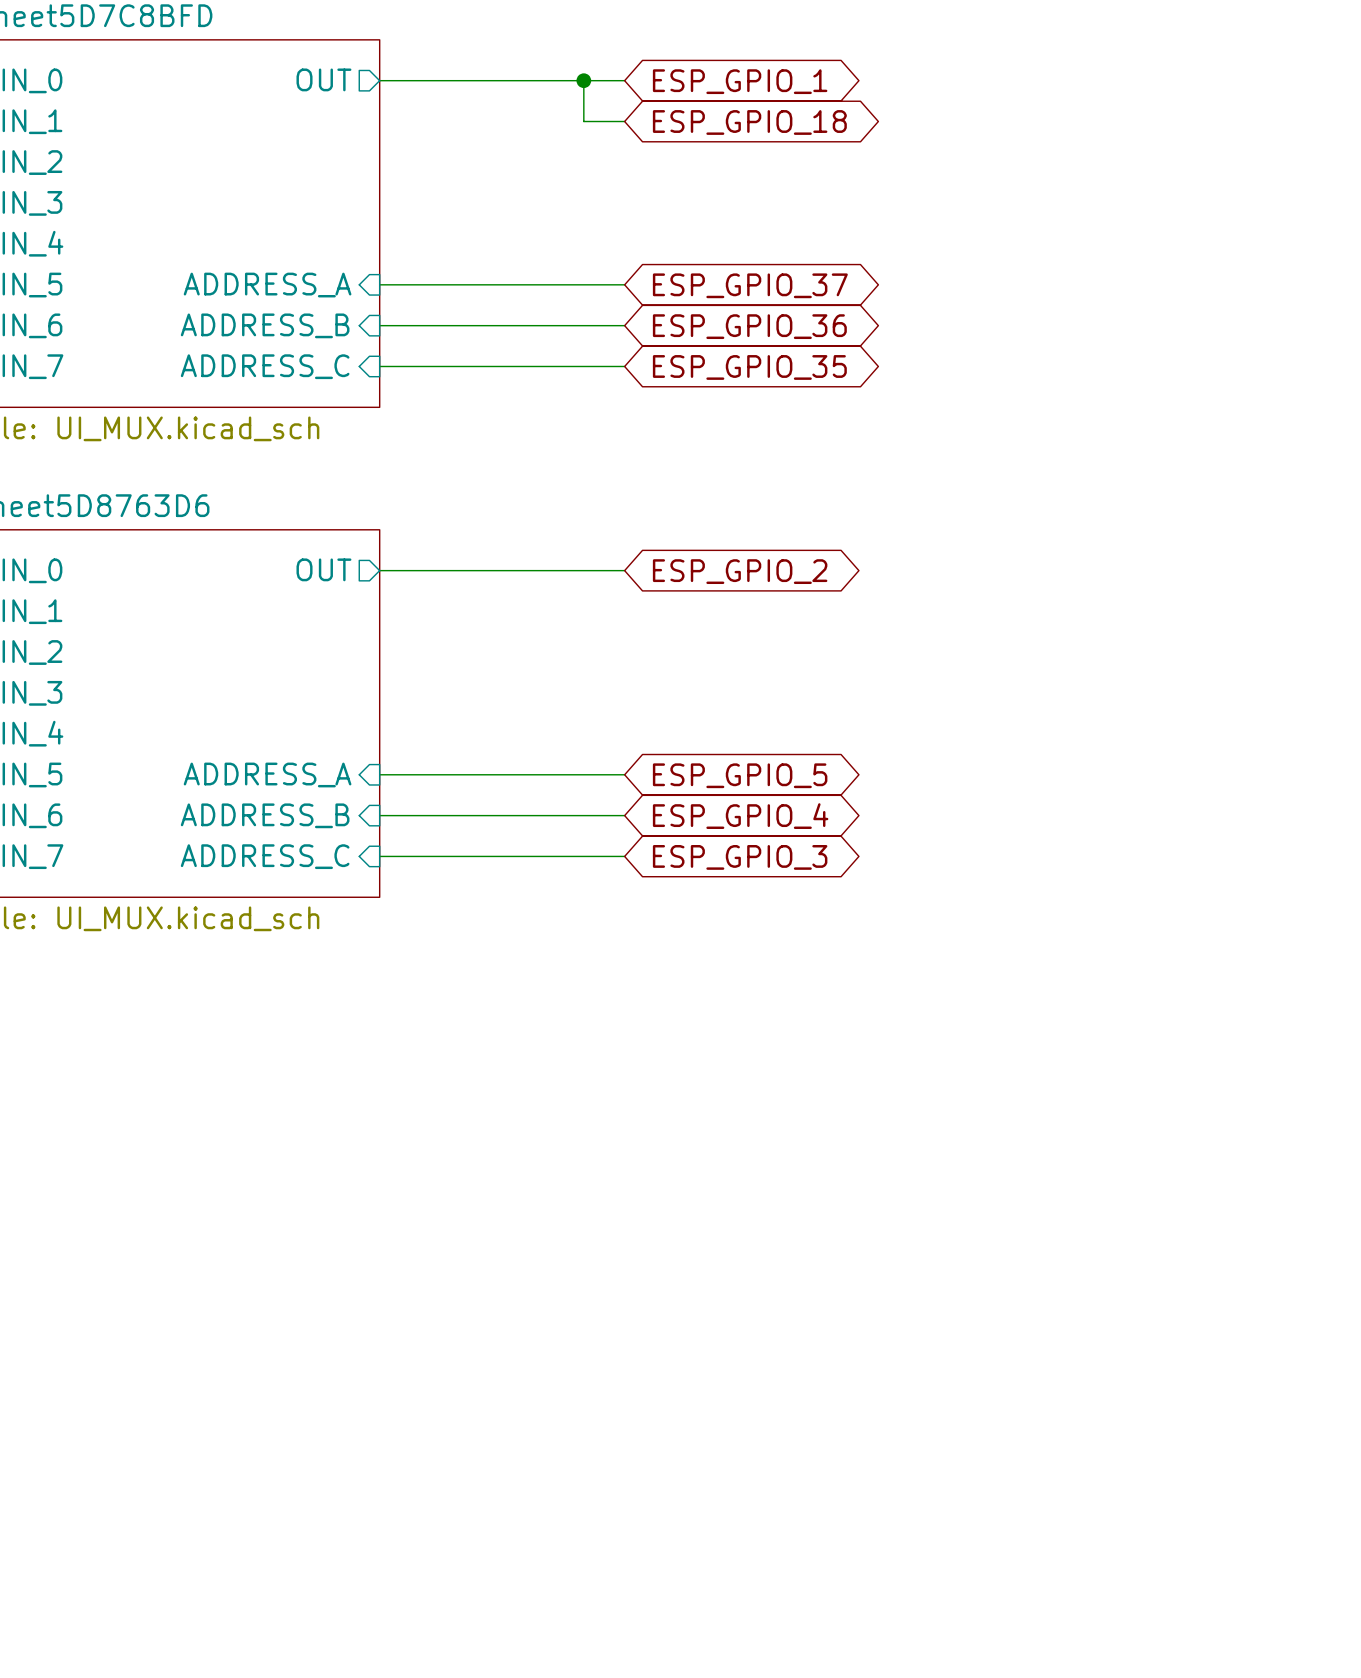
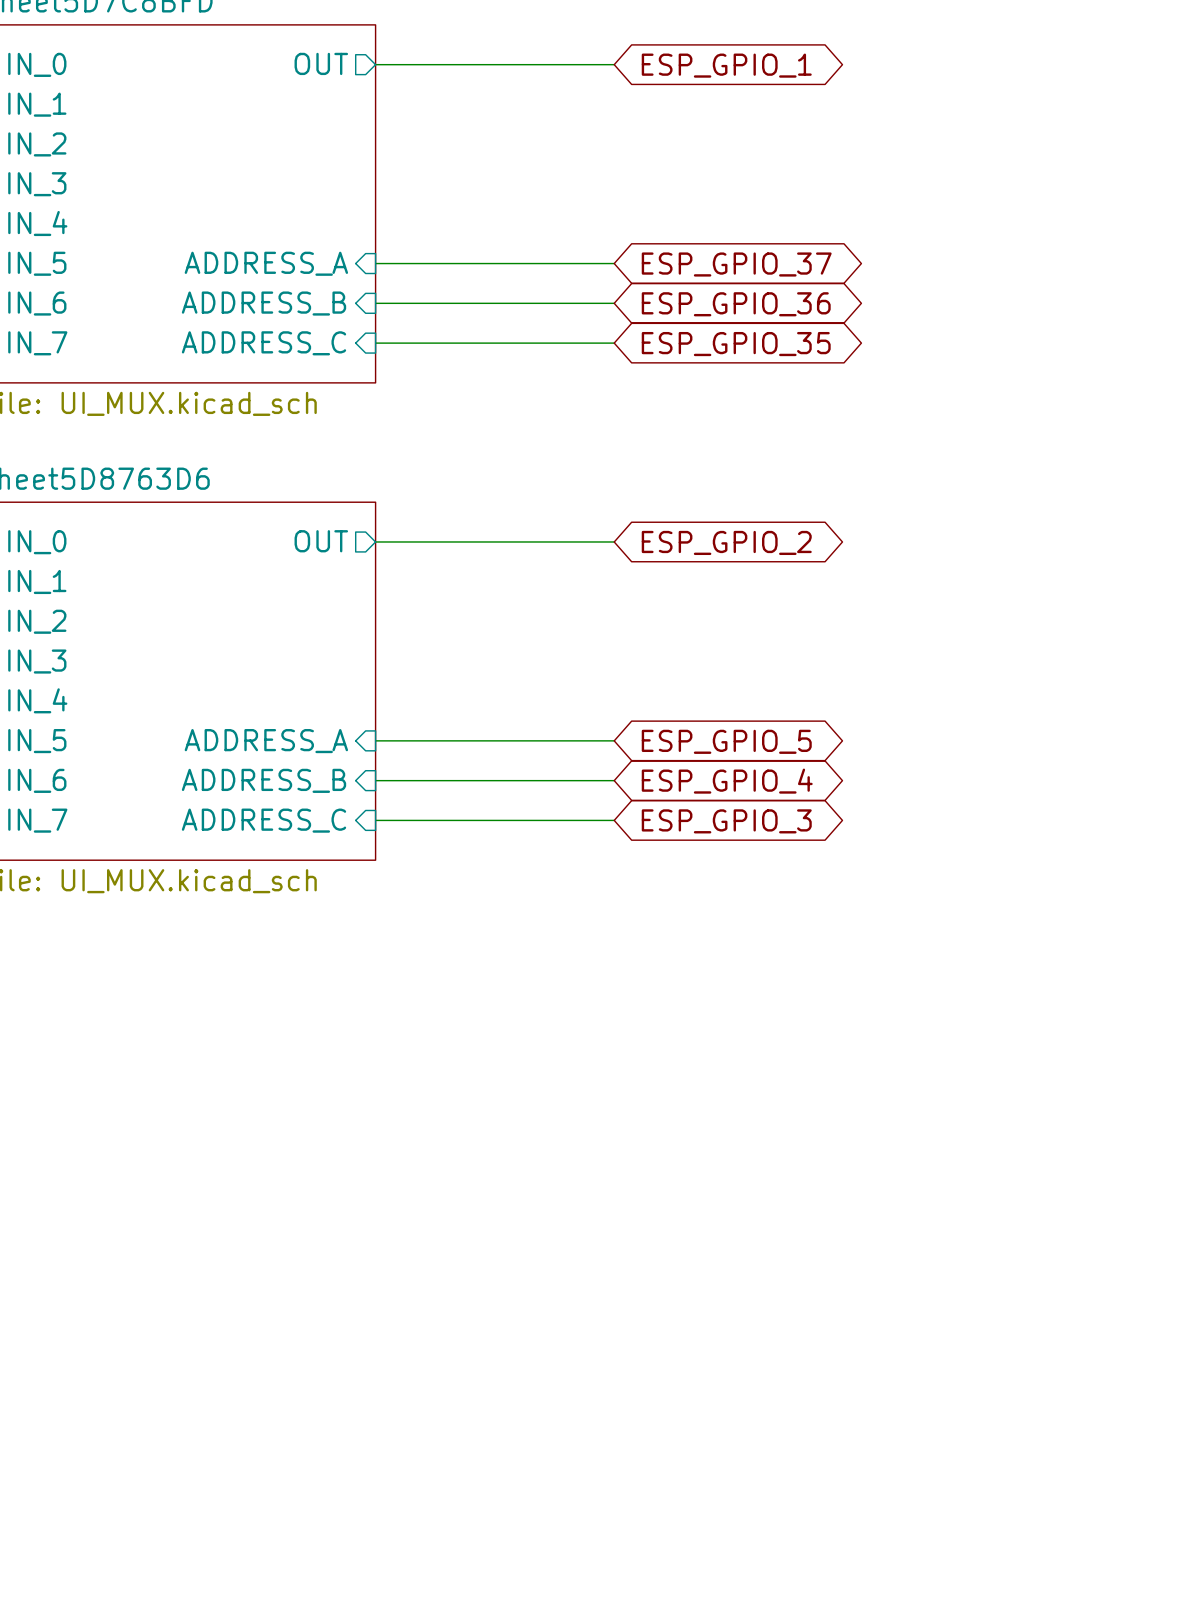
wire: (583, 80) (583, 121) (624, 121) -> none
junction: (583, 80) -> none
global label: ESP_GPIO_18 (749, 122) -> none

